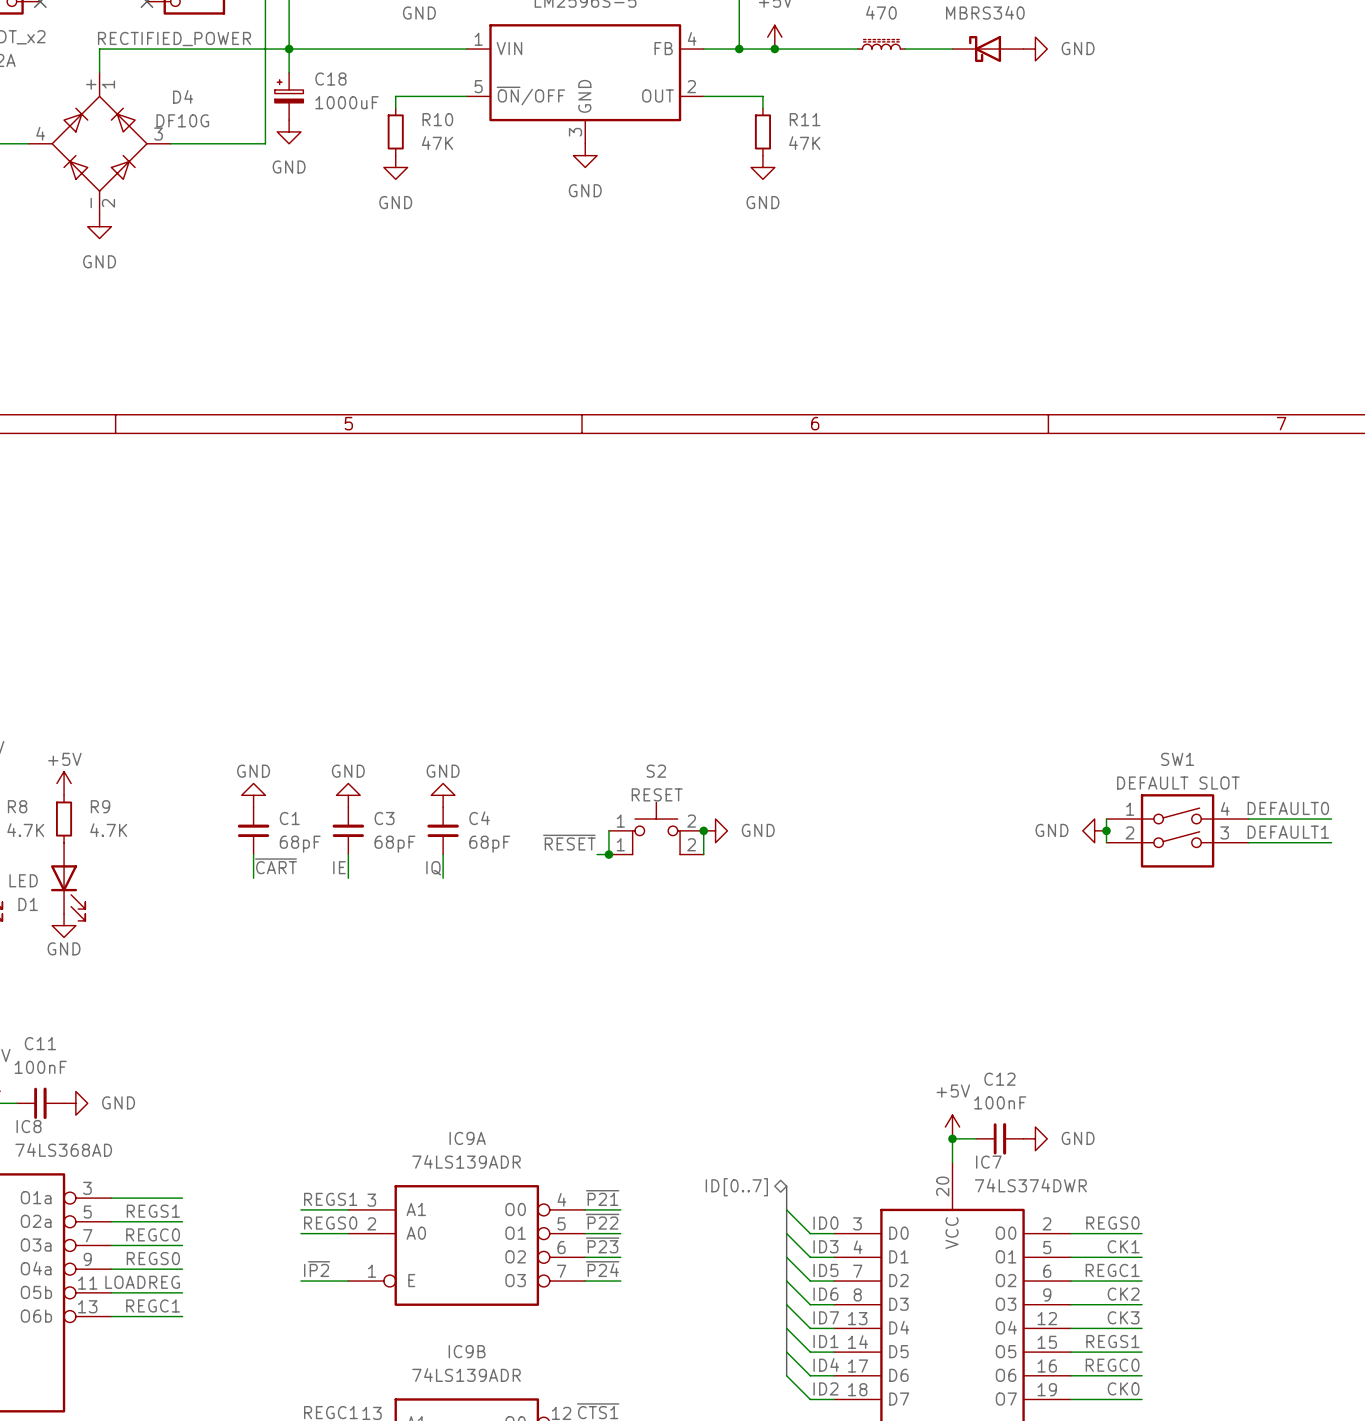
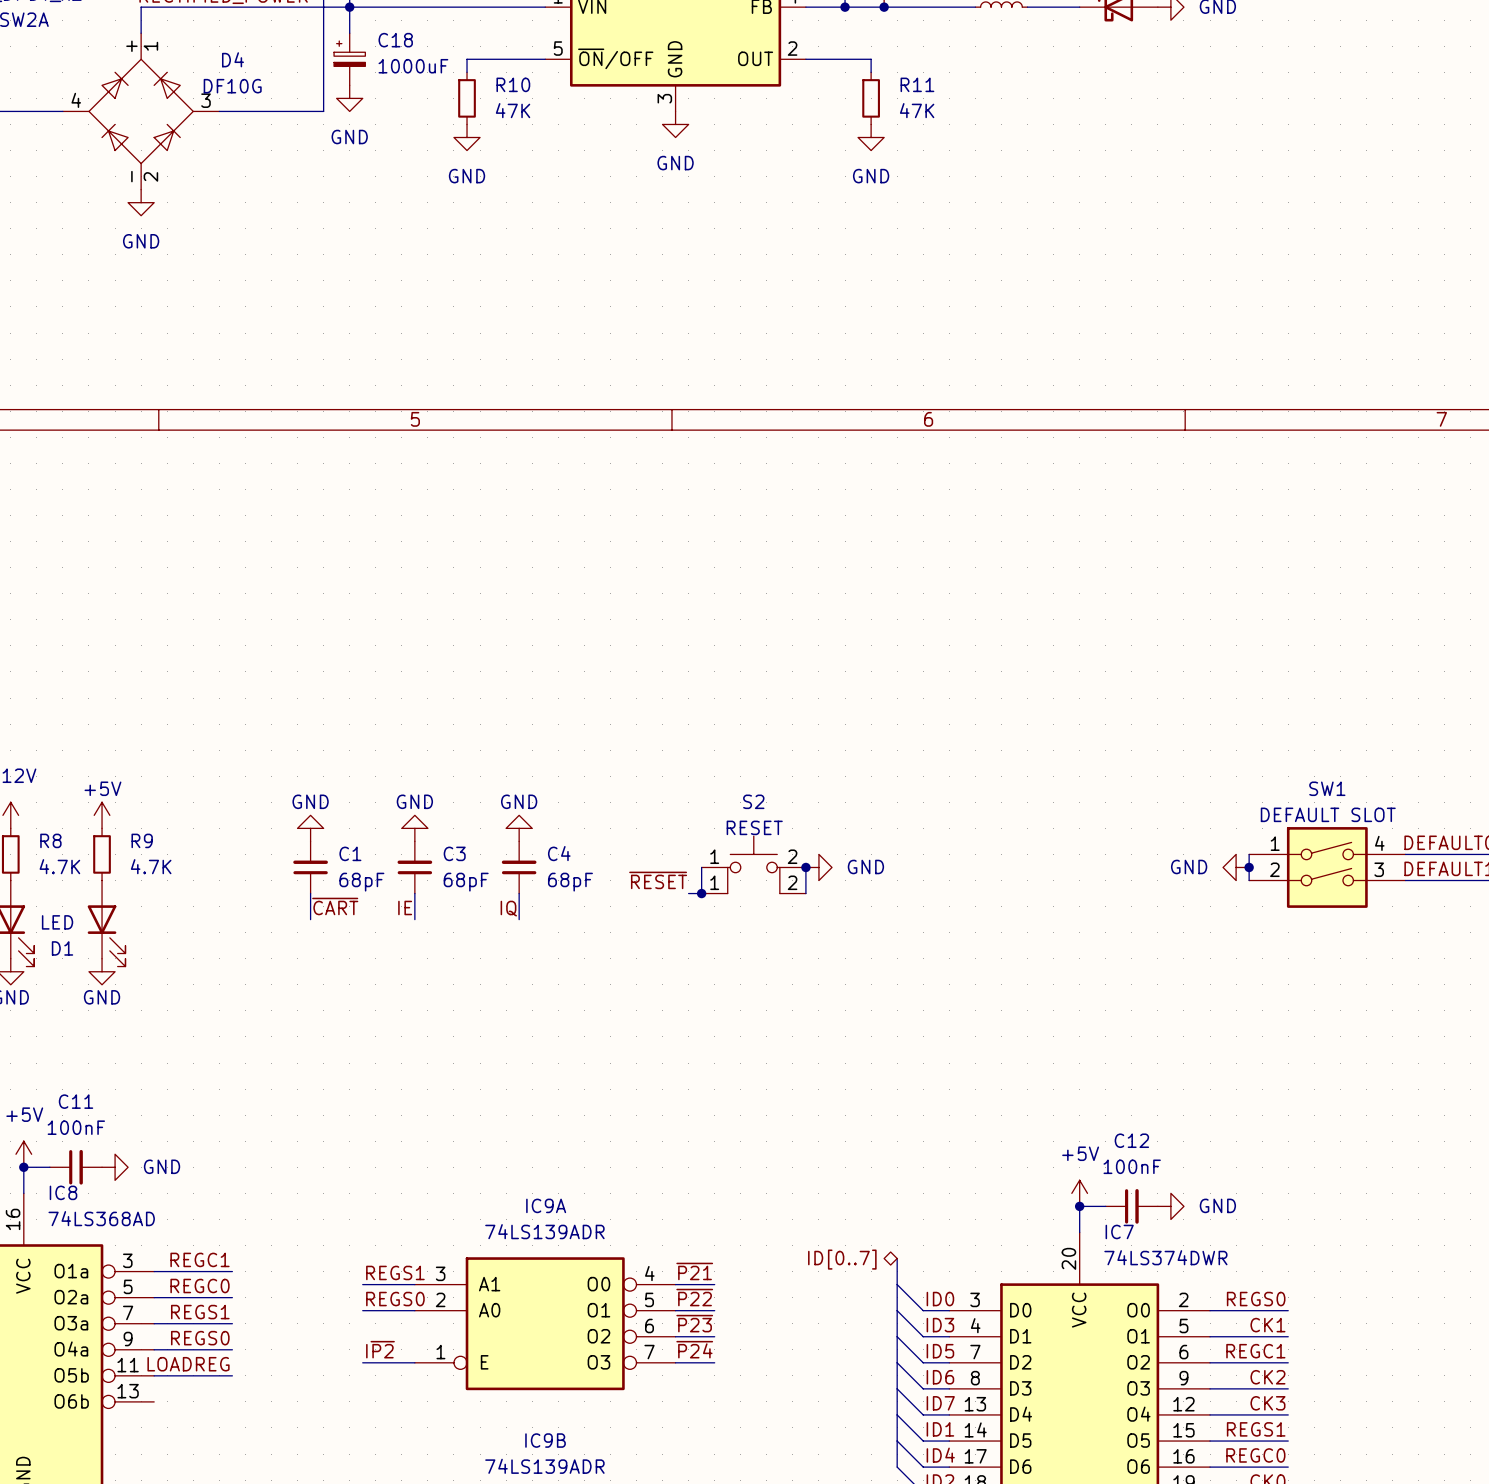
label: REGS1 (153, 1211) -> REGC0 (200, 1286)
label: REGC0 (153, 1234) -> REGS1 (200, 1312)
label position: REGC1 (153, 1305) -> REGC1 (200, 1259)
wire: (111, 1316) (182, 1316) -> none

